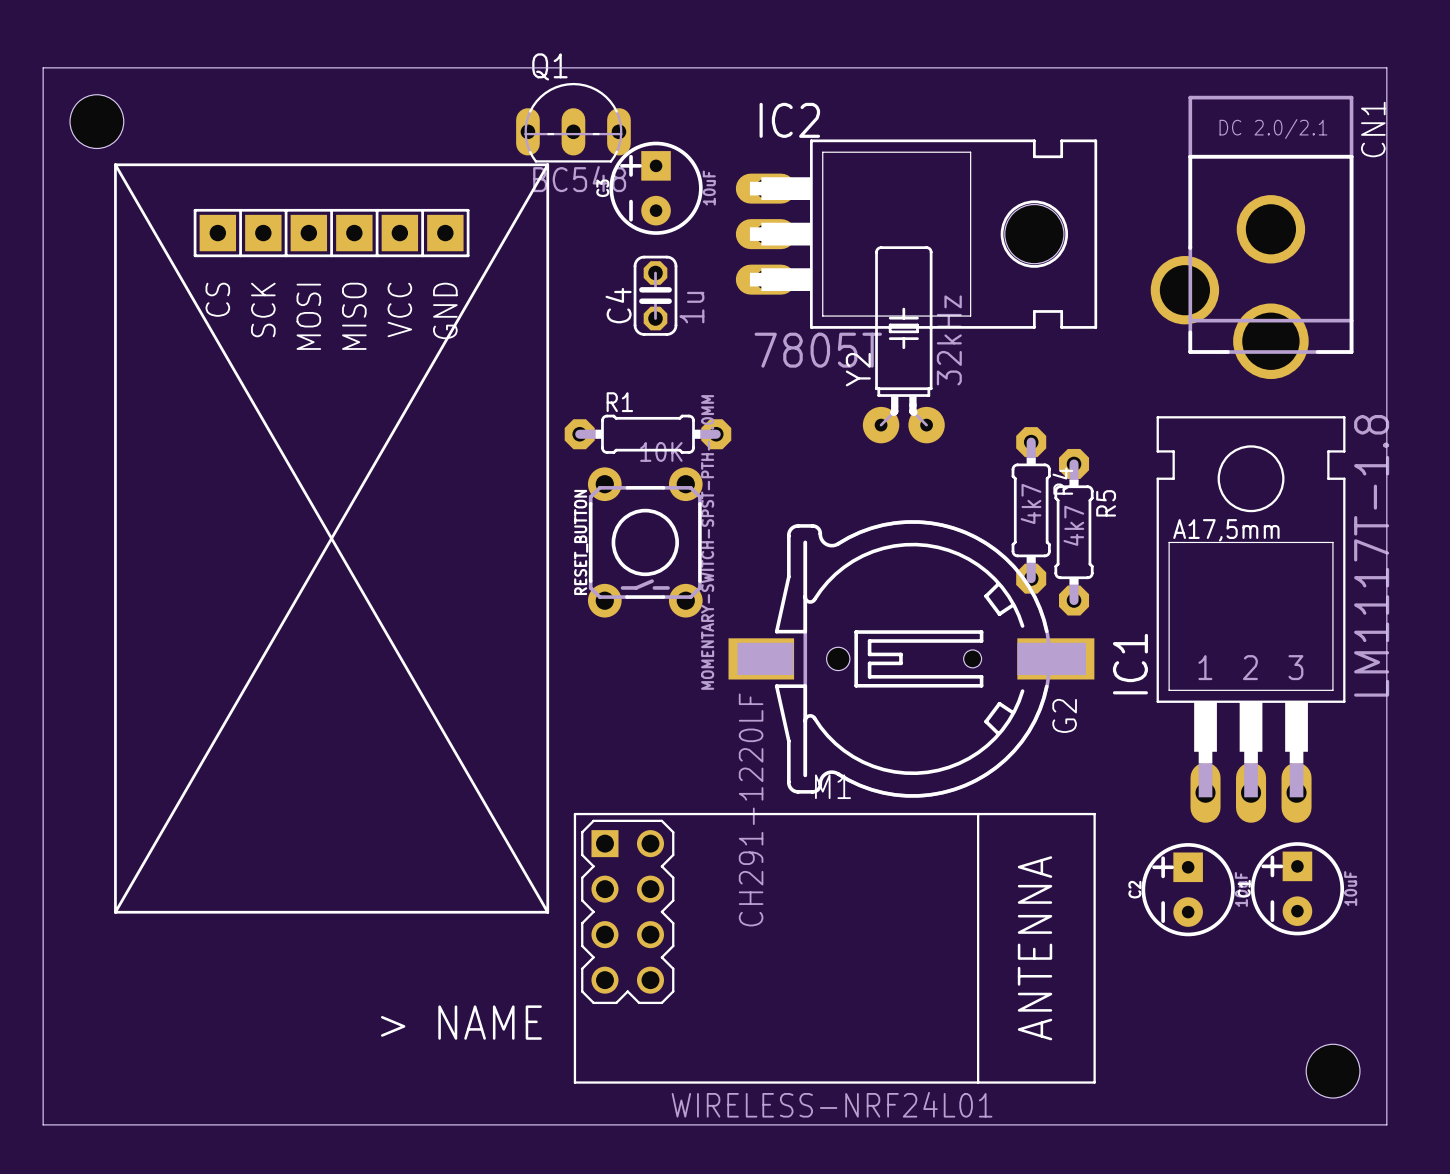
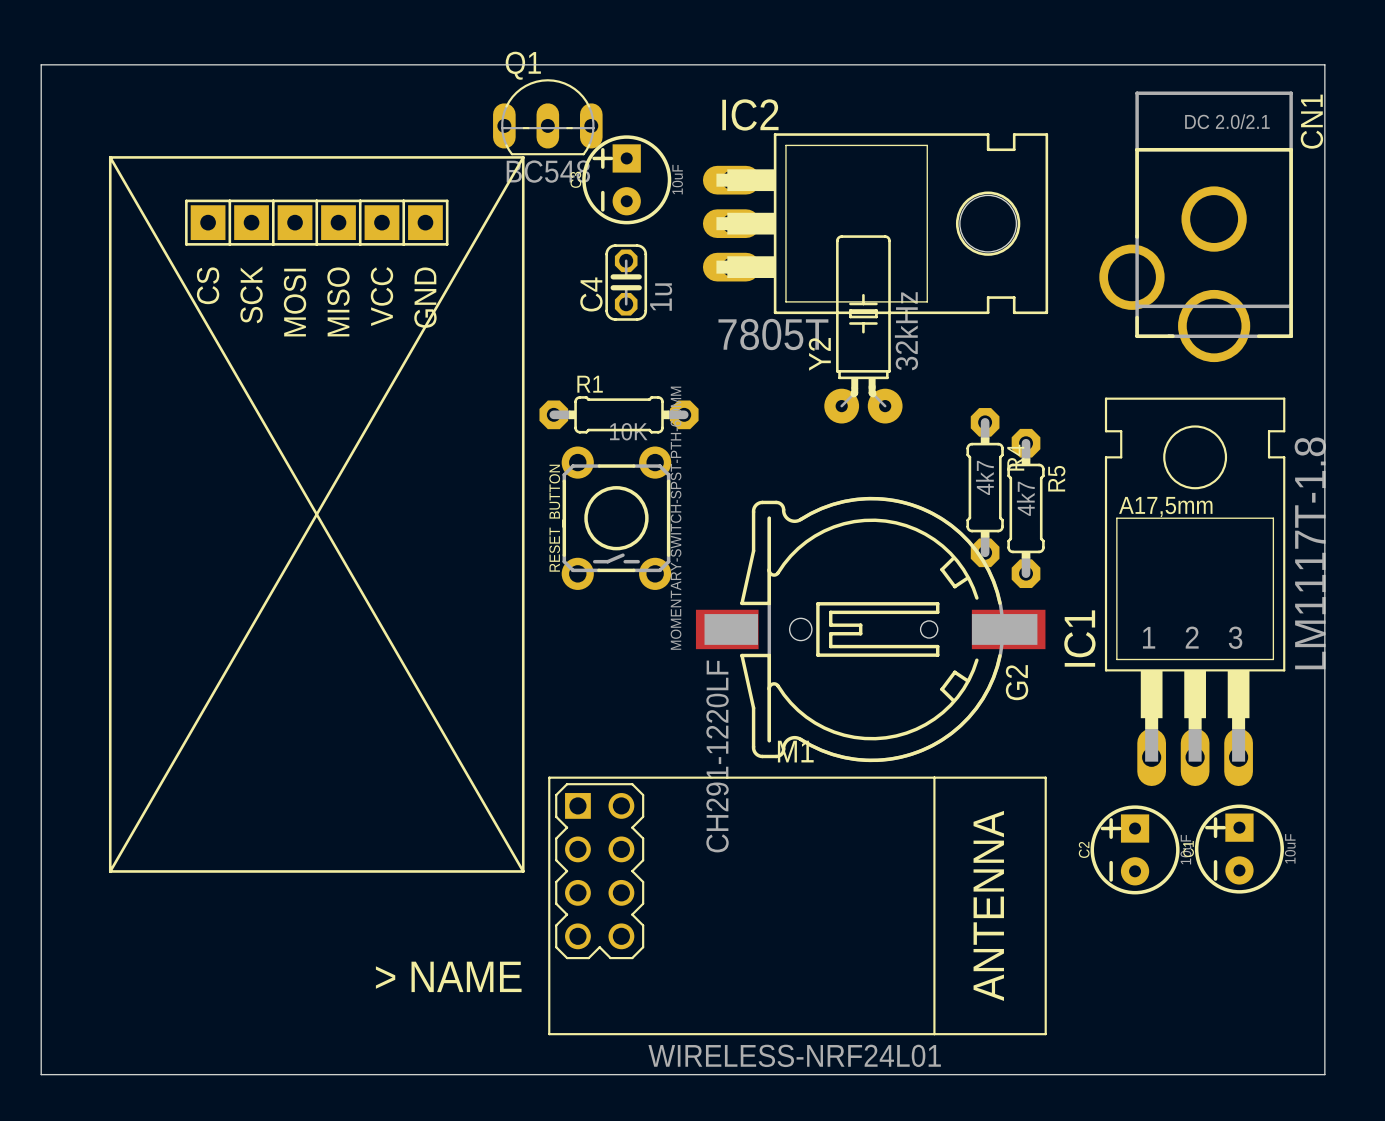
hole: (96, 121) -> none
hole: (1333, 1071) -> none

